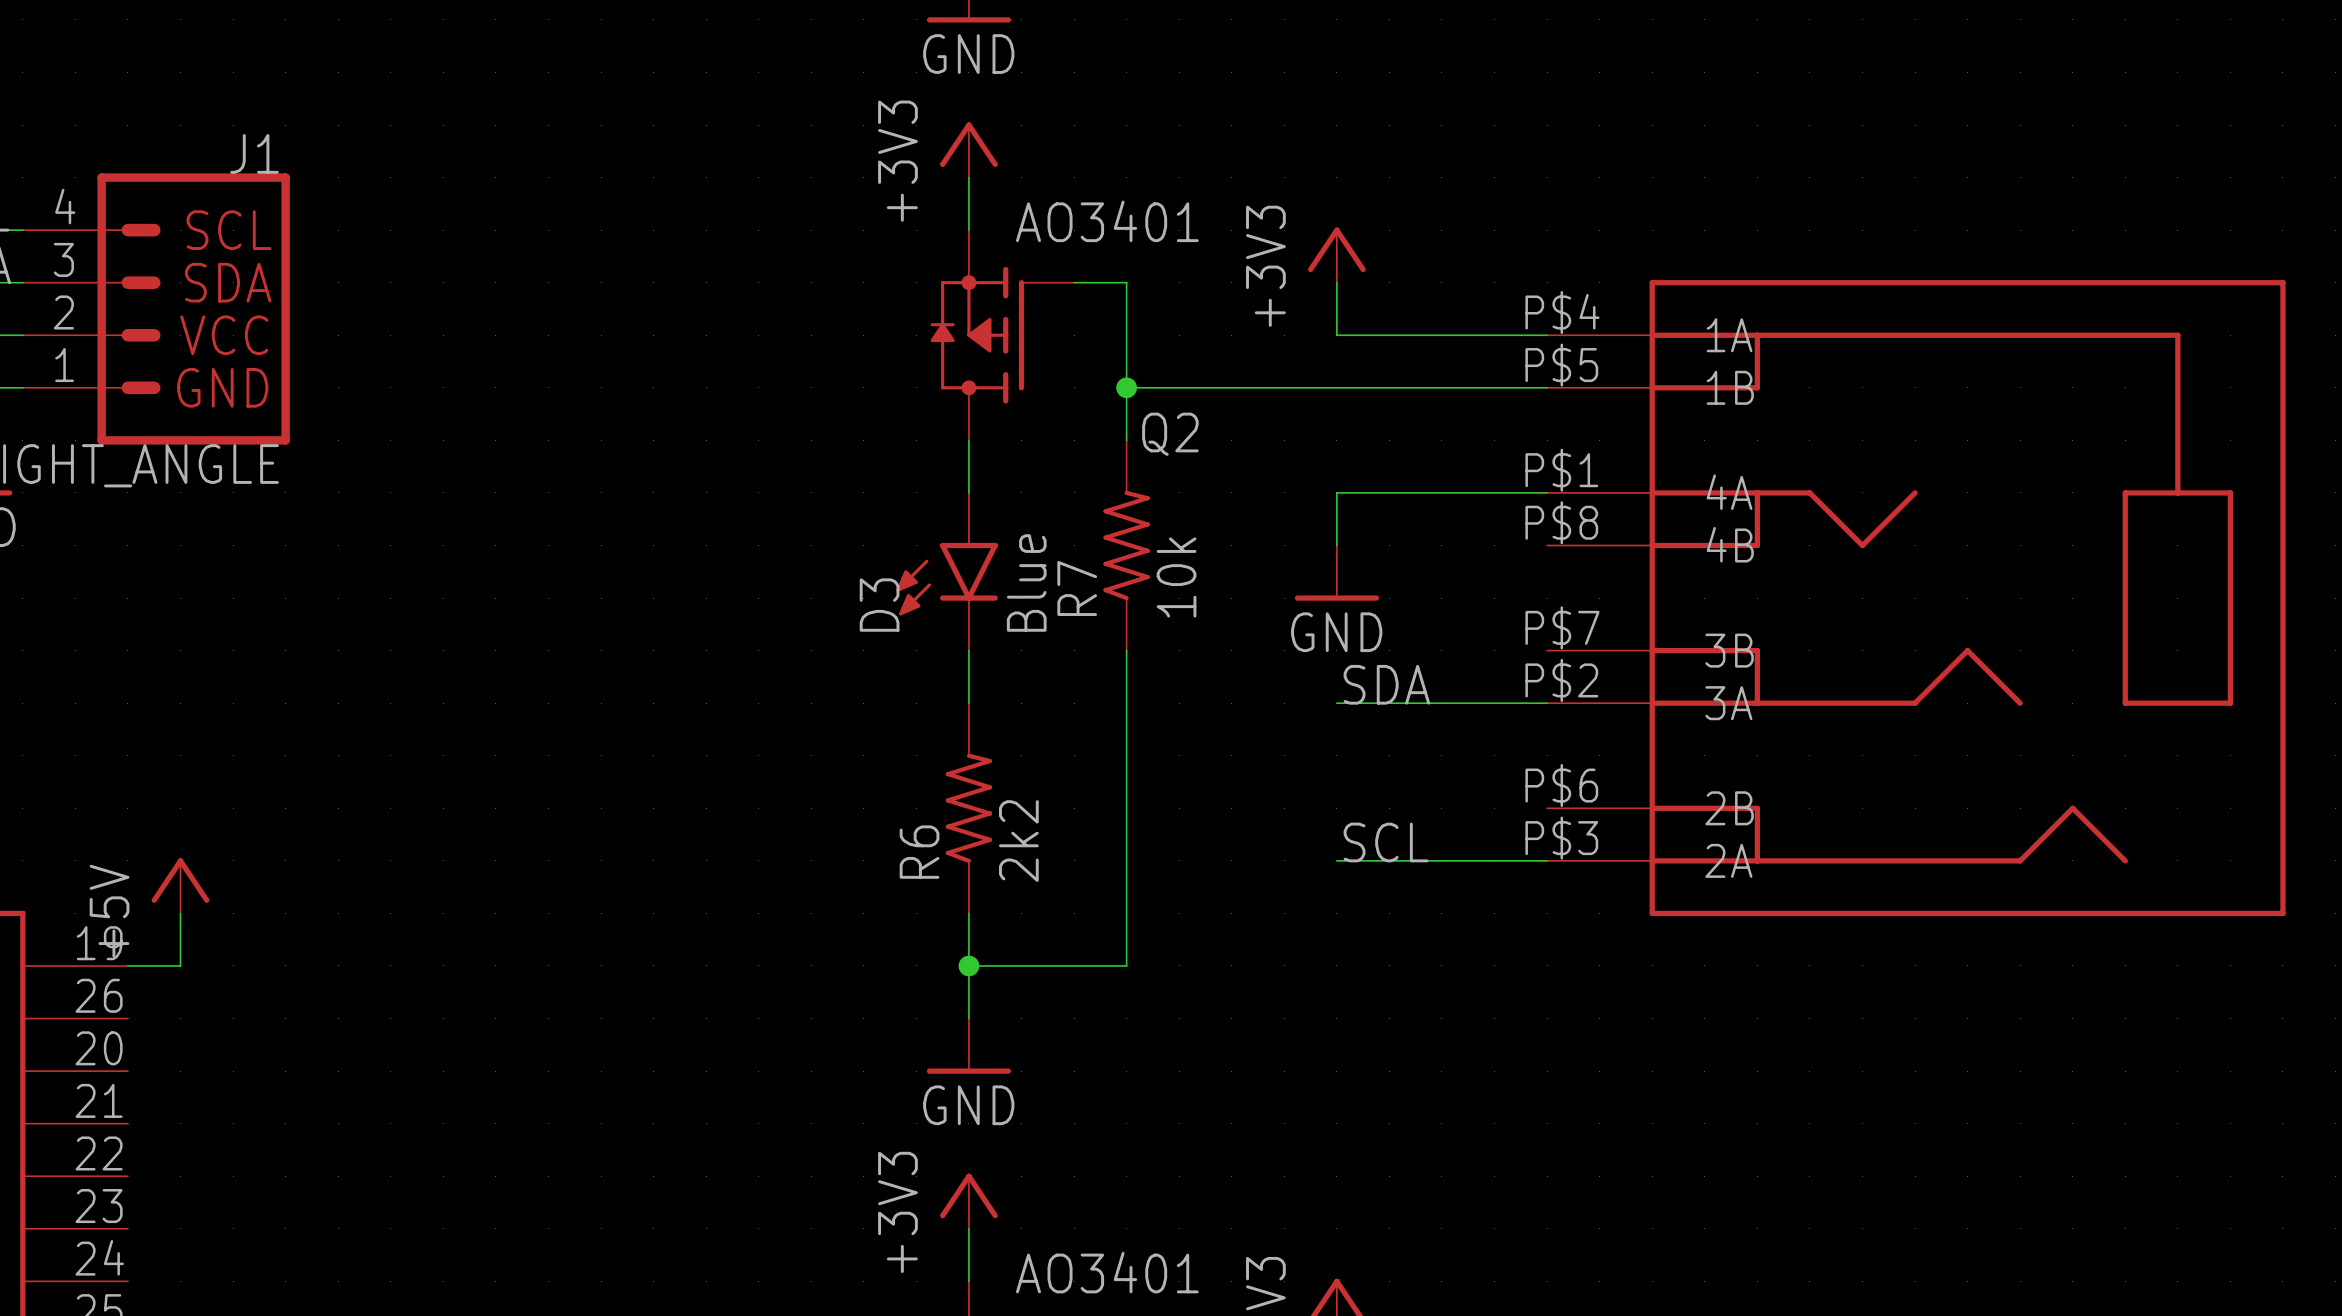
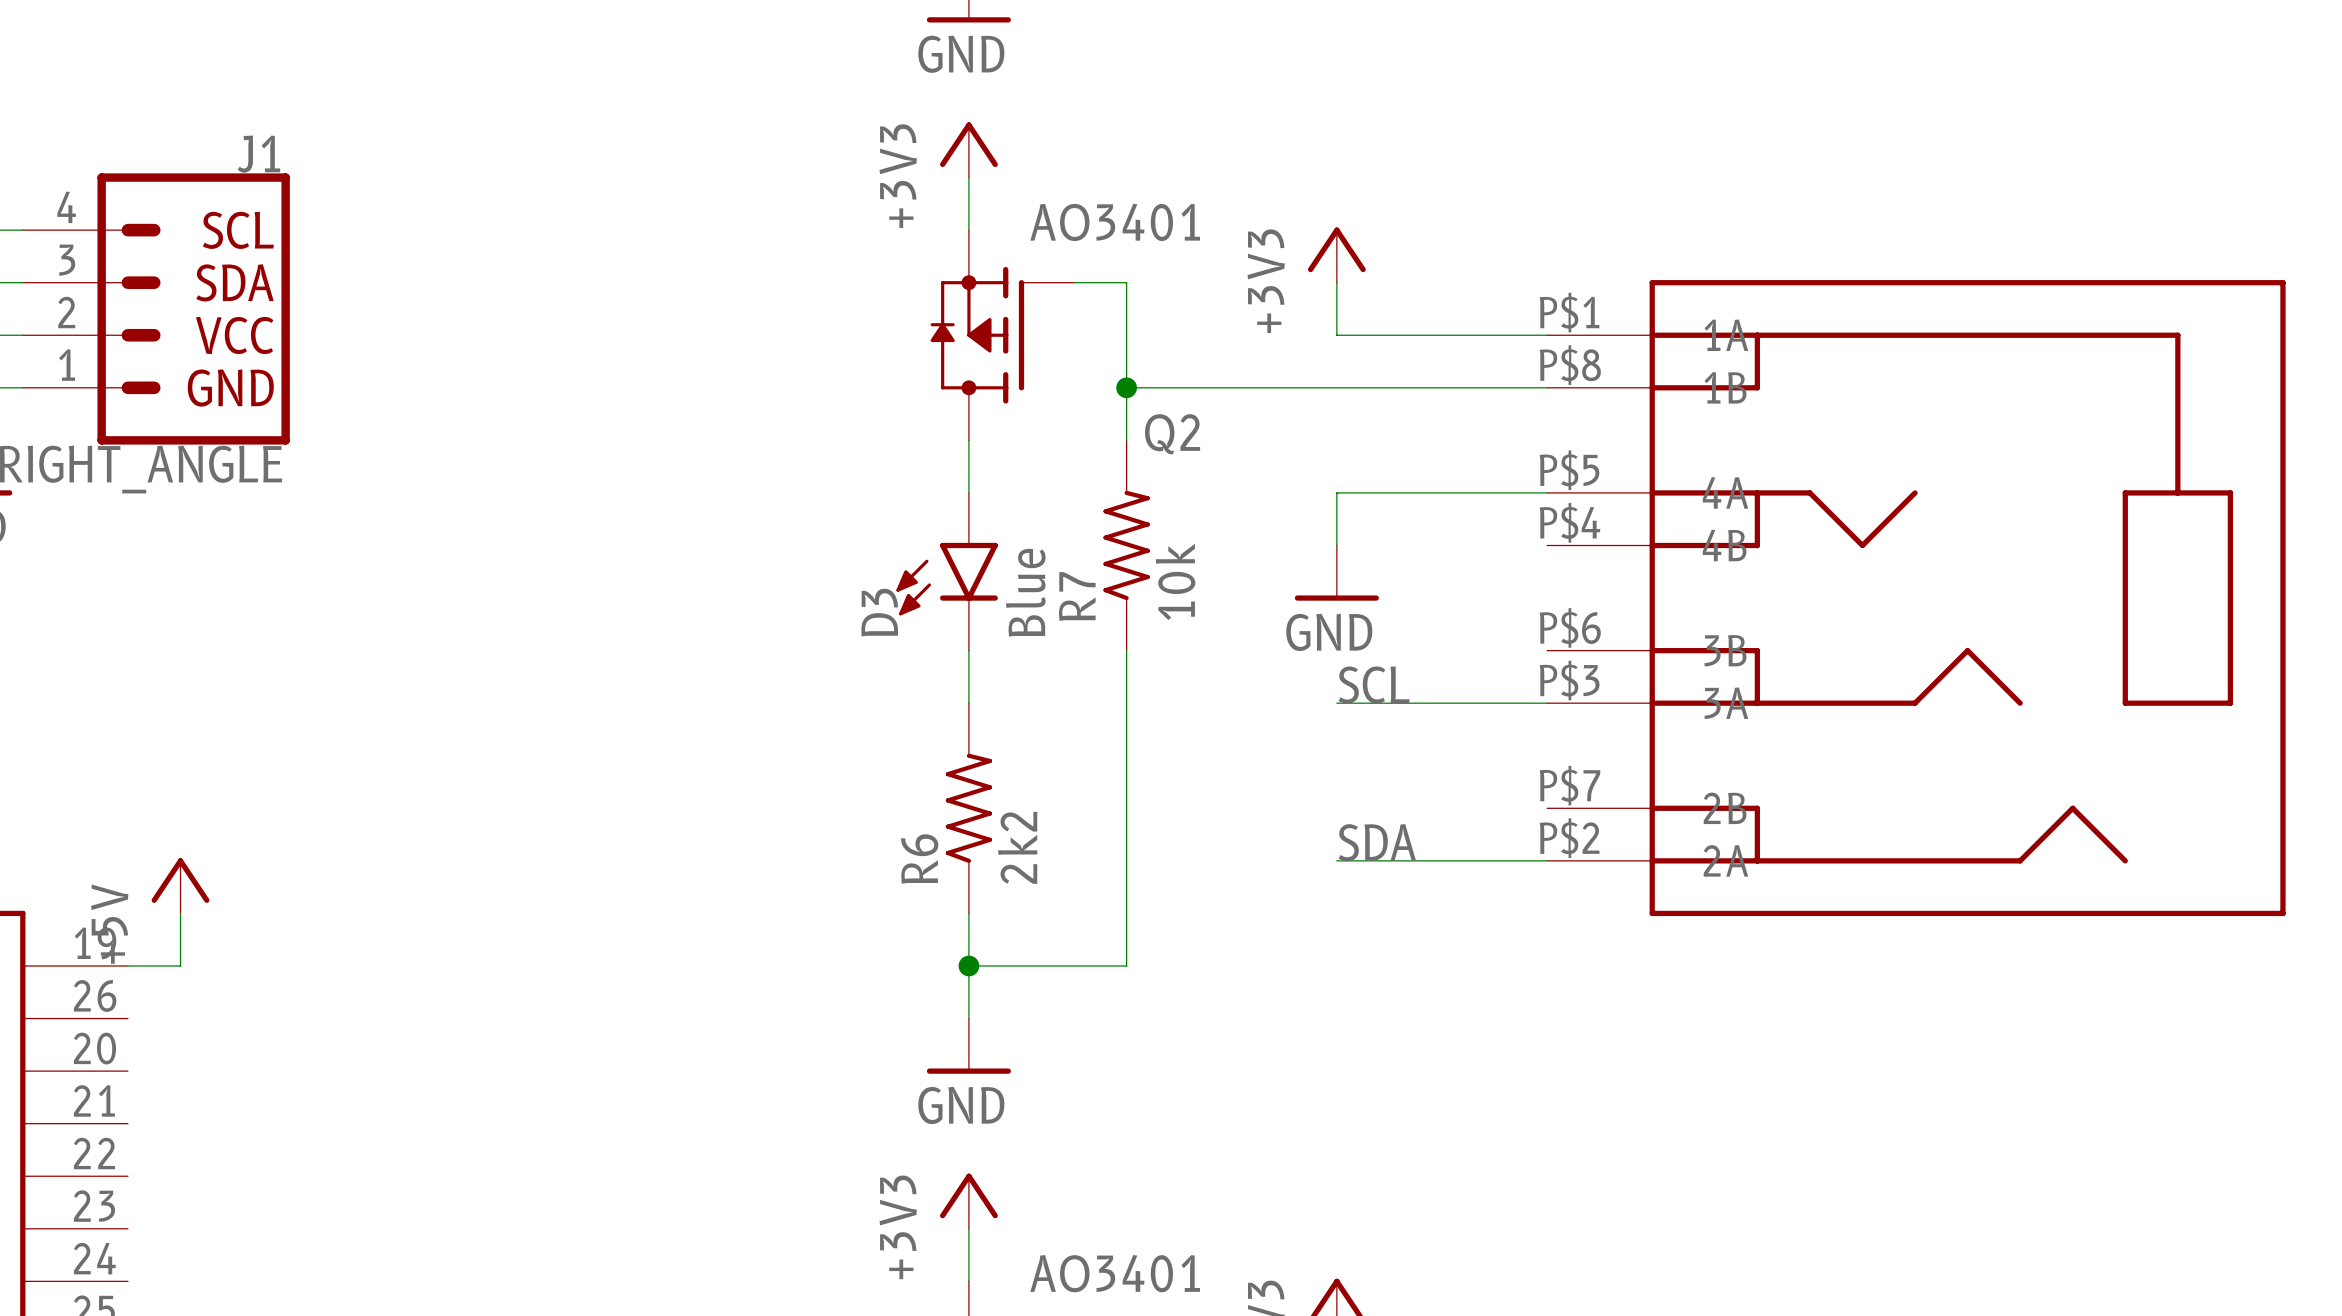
part pin number: P$4 (1562, 312) -> P$1 (1569, 312)
part pin number: P$5 (1561, 365) -> P$8 (1570, 365)
part pin number: P$1 (1561, 470) -> P$5 (1569, 470)
part pin number: P$8 (1561, 522) -> P$4 (1569, 522)
part pin number: P$7 (1562, 627) -> P$6 (1570, 627)
part pin number: P$2 (1561, 680) -> P$3 (1569, 680)
label: SDA (1386, 684) -> SCL (1374, 684)
part pin number: P$6 (1561, 785) -> P$7 (1569, 785)
part pin number: P$3 (1561, 838) -> P$2 (1569, 838)
label: SCL (1386, 842) -> SDA (1377, 842)

